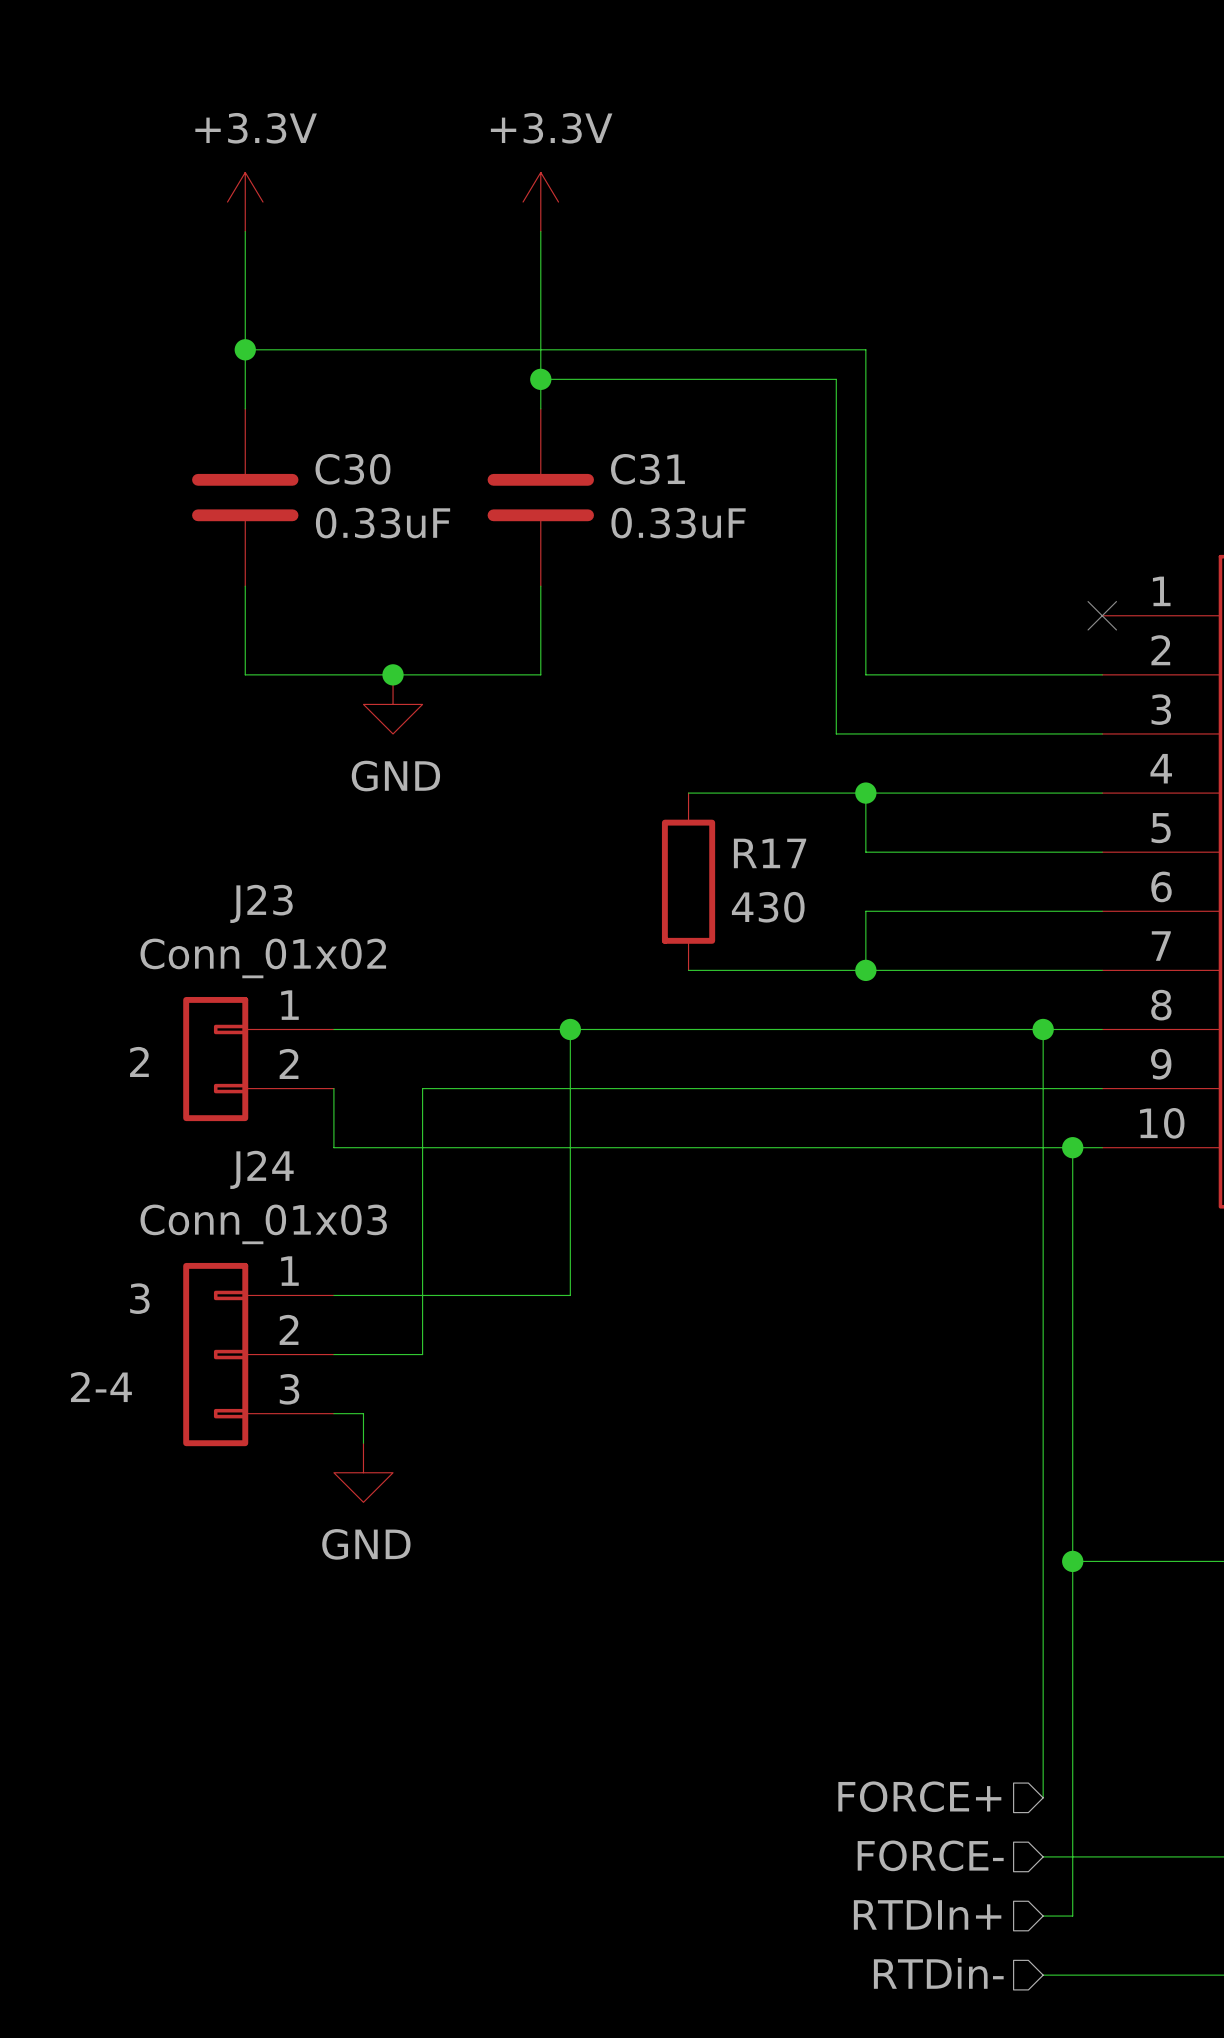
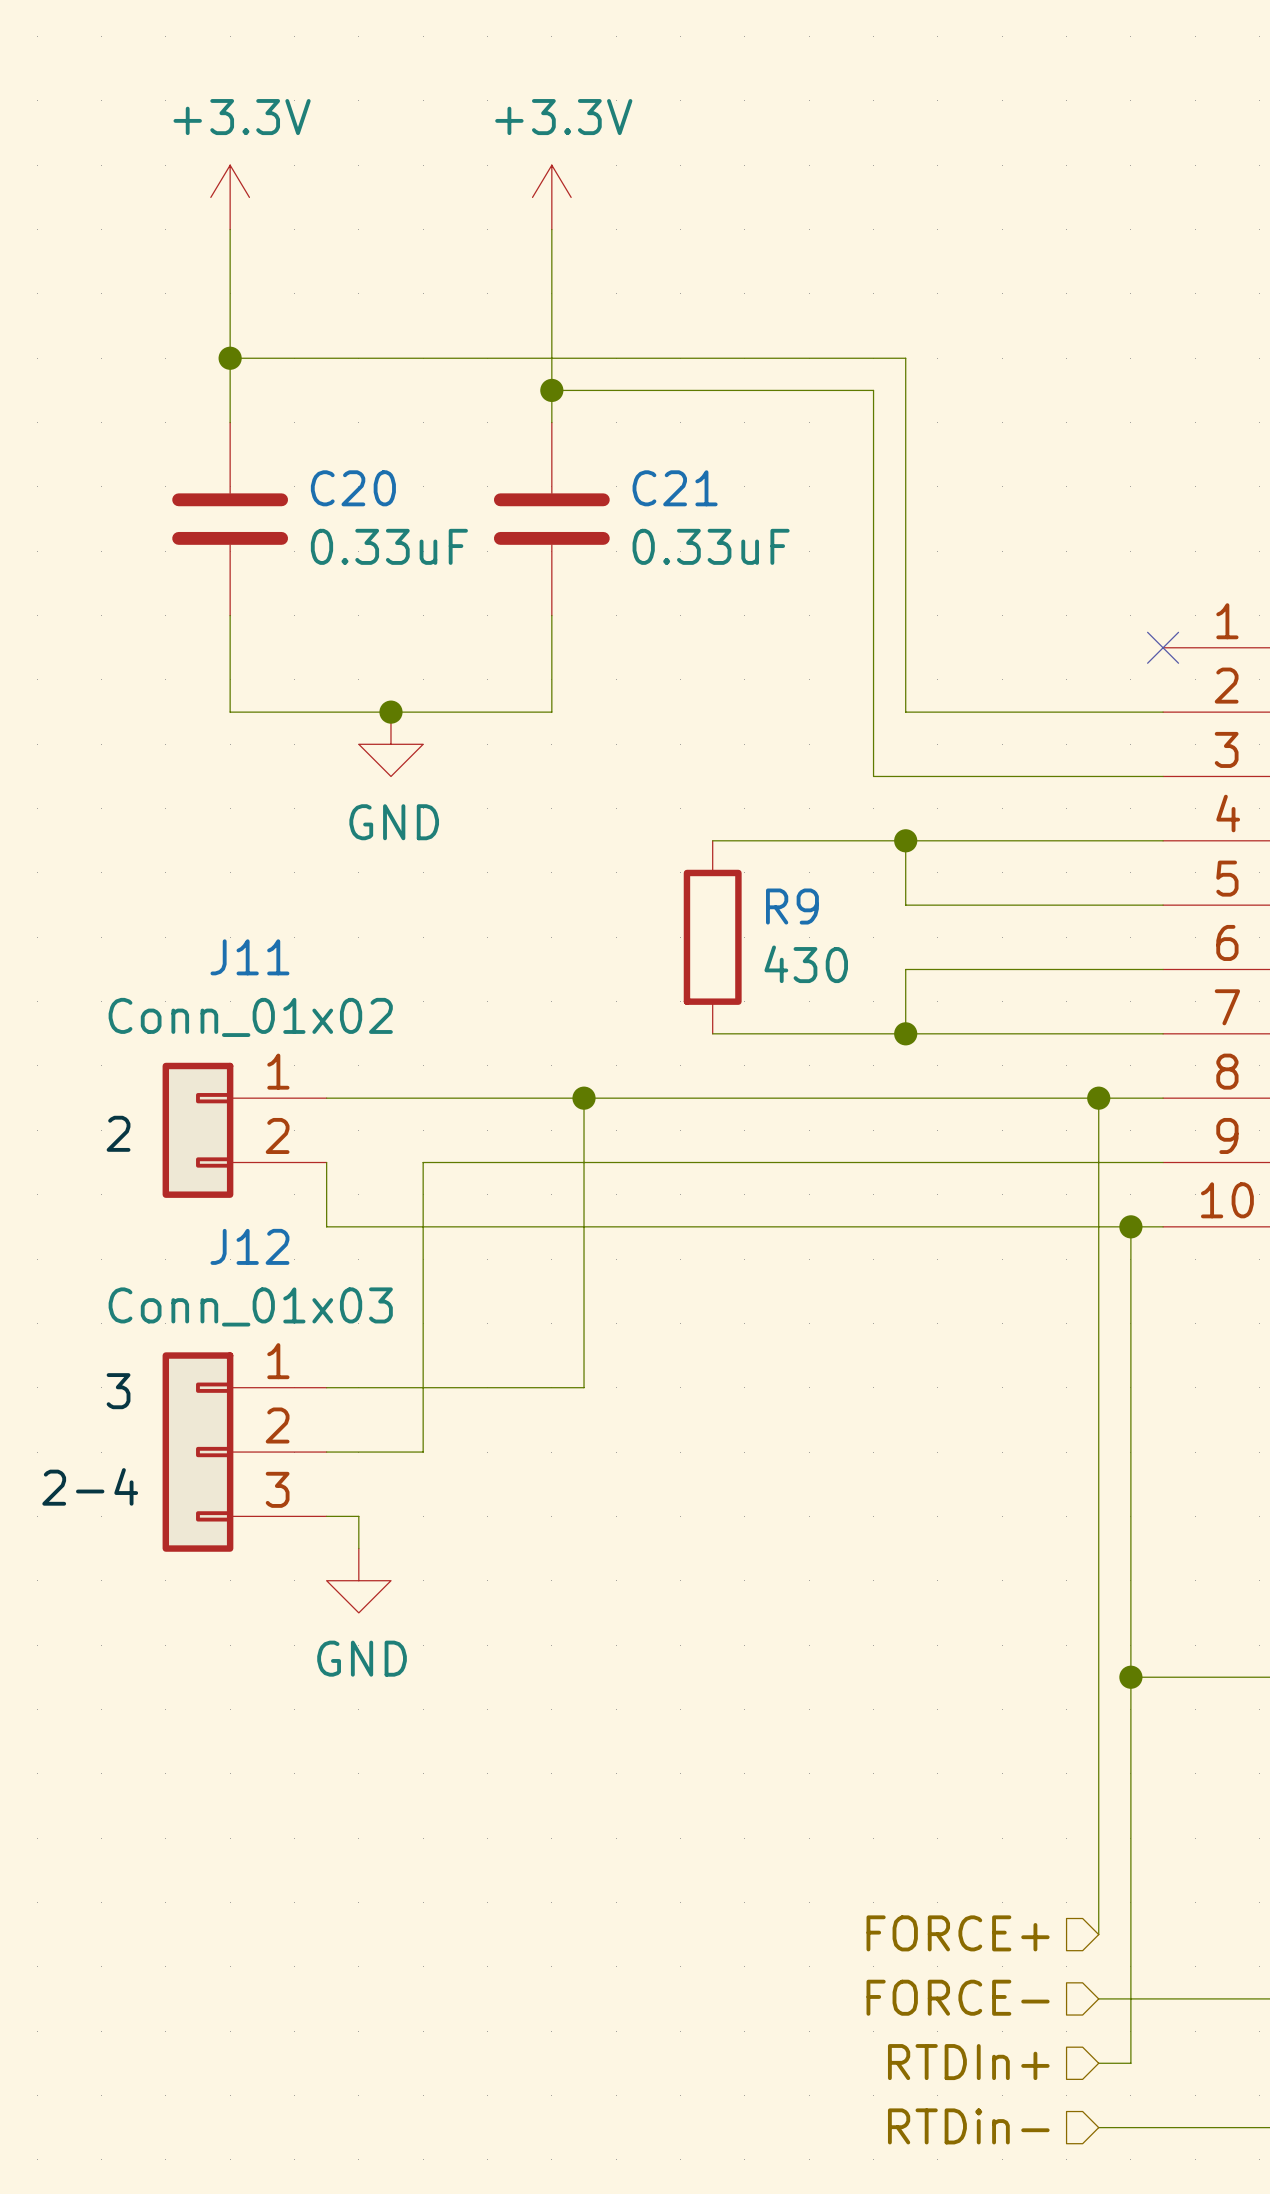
C30 name: C30 (352, 469) -> C20 (353, 488)
C31 name: C31 (647, 469) -> C21 (675, 488)
R17 name: R17 (770, 853) -> R9 (792, 906)
J23 name: J23 (261, 903) -> J11 (249, 957)
J24 name: J24 (262, 1169) -> J12 (249, 1246)

